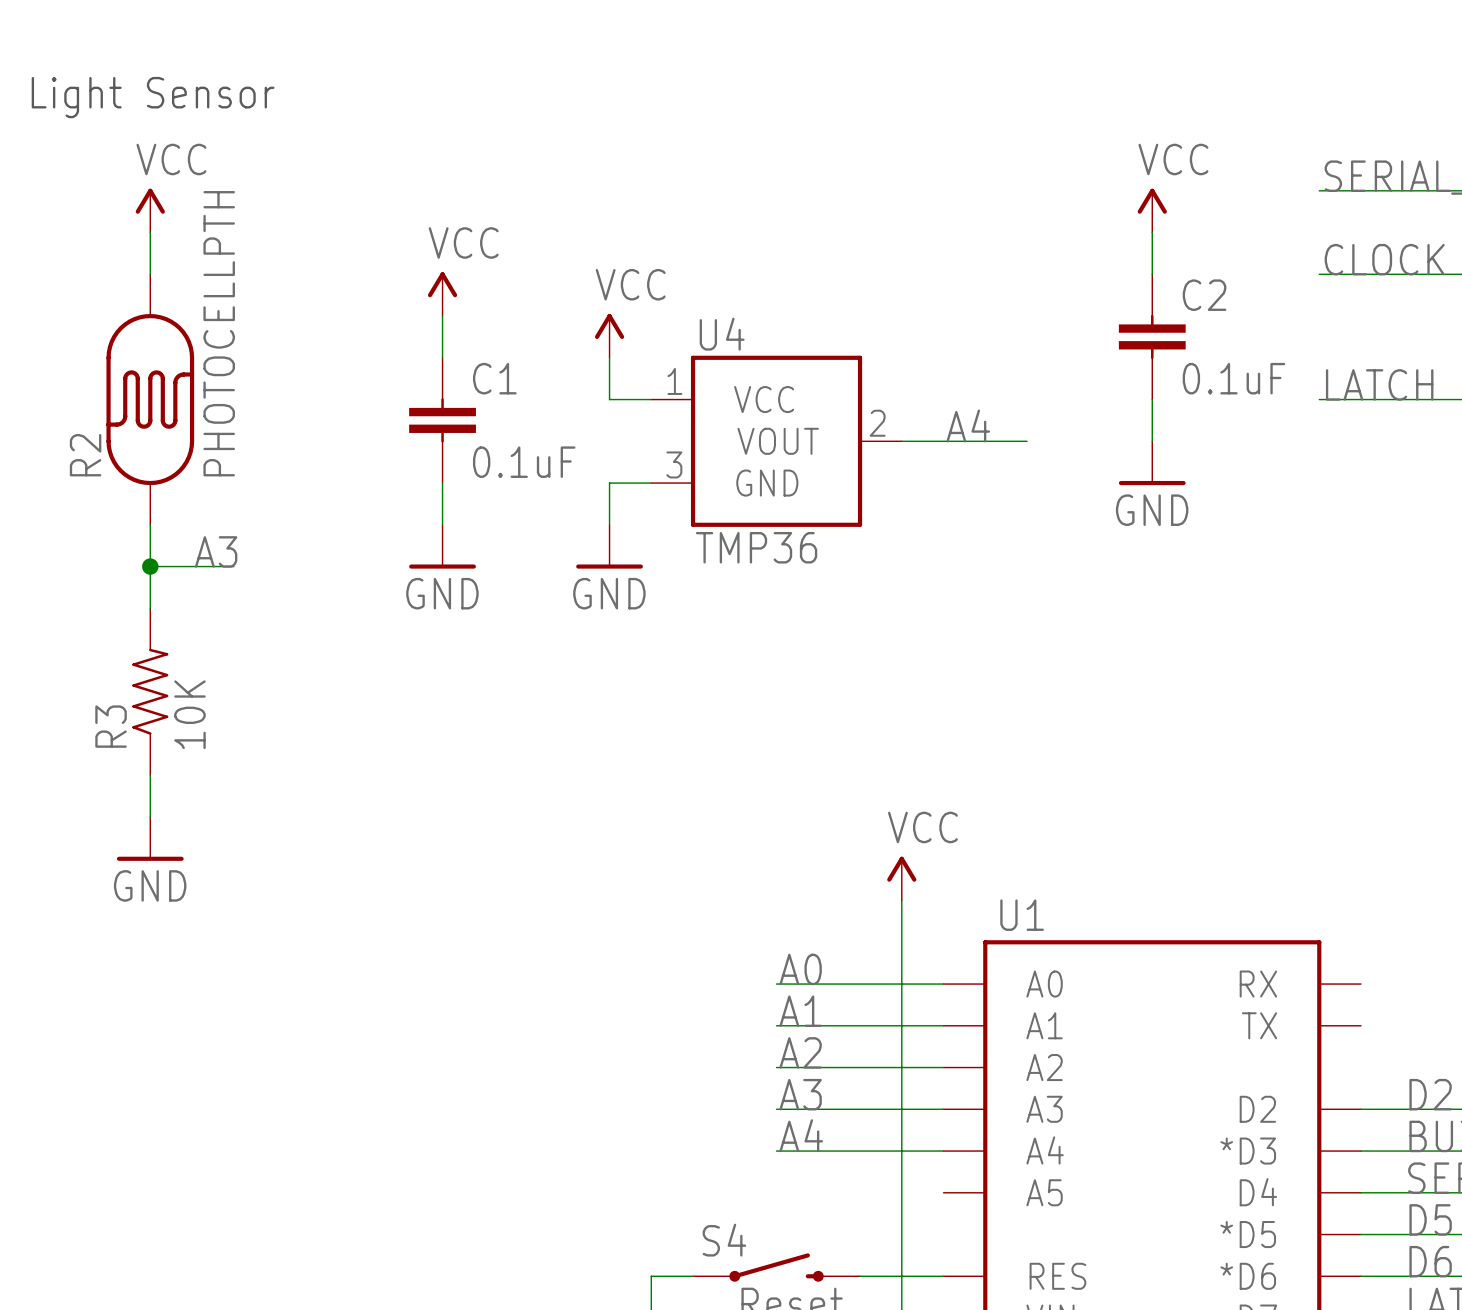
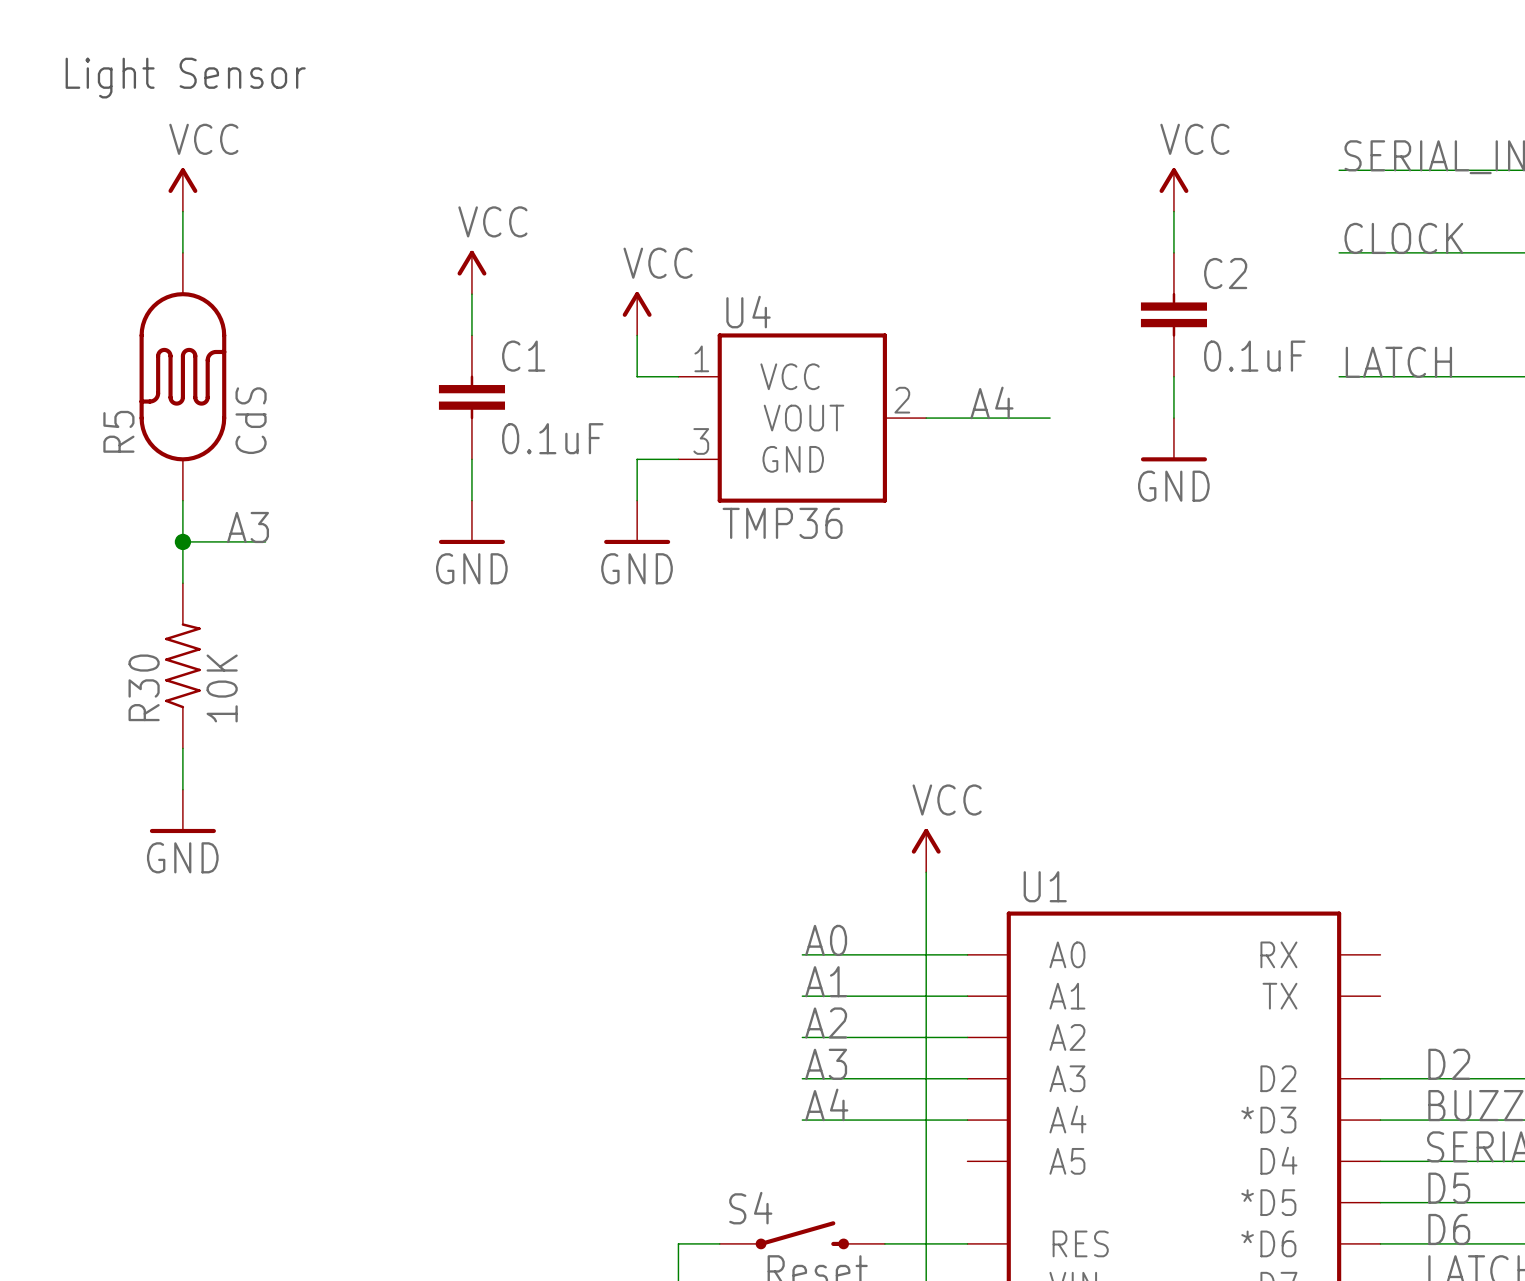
R2 value: PHOTOCELLPTH (219, 333) -> CdS (251, 420)
R2 name: R2 (85, 455) -> R5 (118, 431)
R3 name: R3 (111, 726) -> R30 (144, 687)

